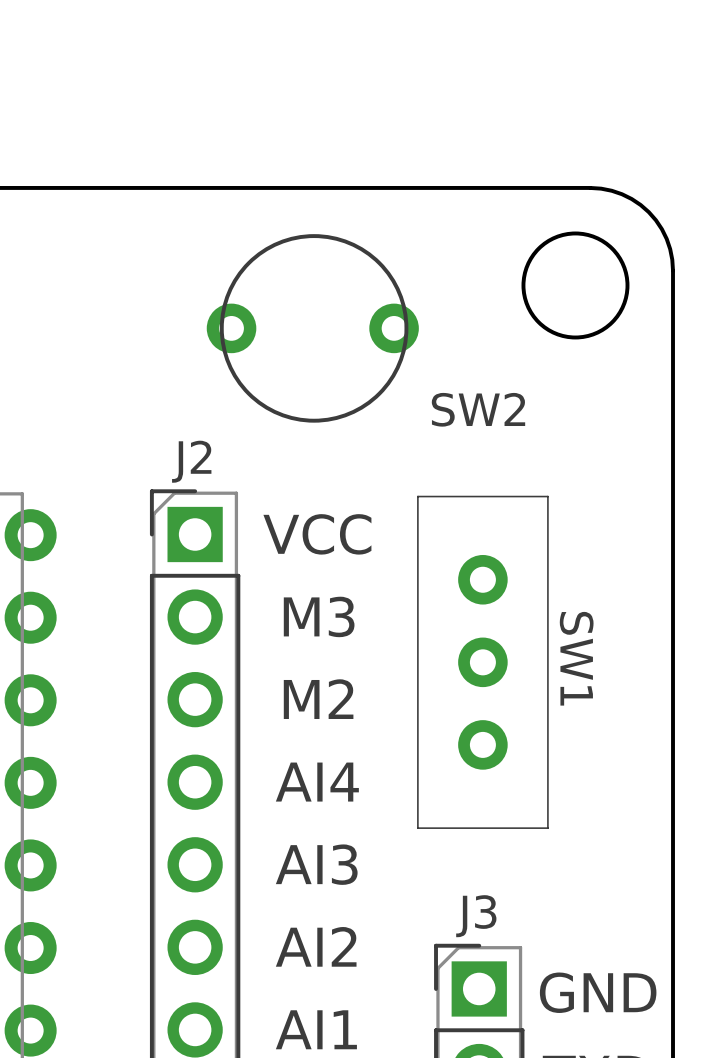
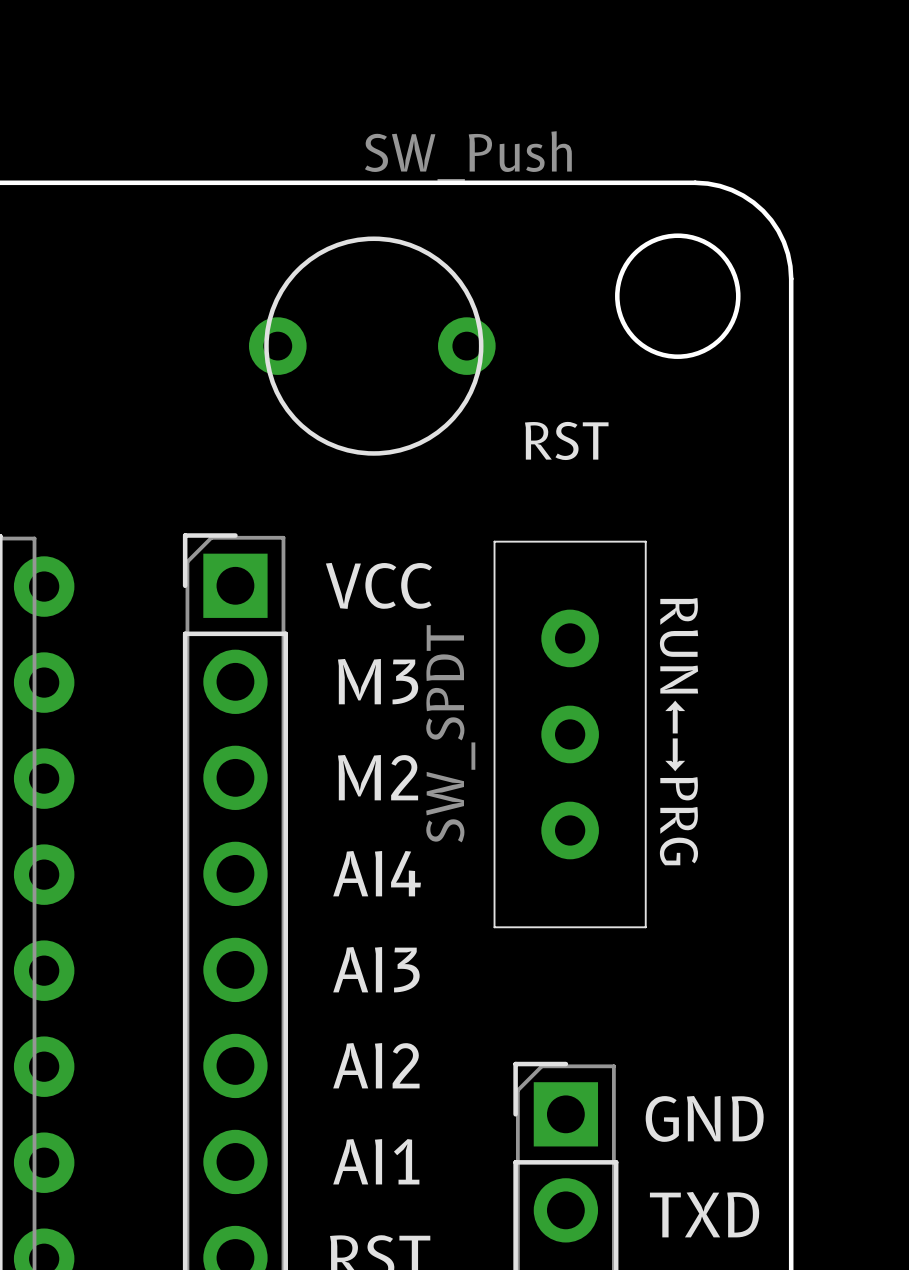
SW2 value: none -> SW_Push (468, 157)
SW2 name: SW2 (478, 409) -> RST (566, 440)
J2 name: J2 (191, 461) -> none
SW1 name: SW1 (576, 658) -> RUN←→PRG (678, 731)
SW1 value: none -> SW_SPDT (450, 733)
J3 name: J3 (476, 916) -> none

